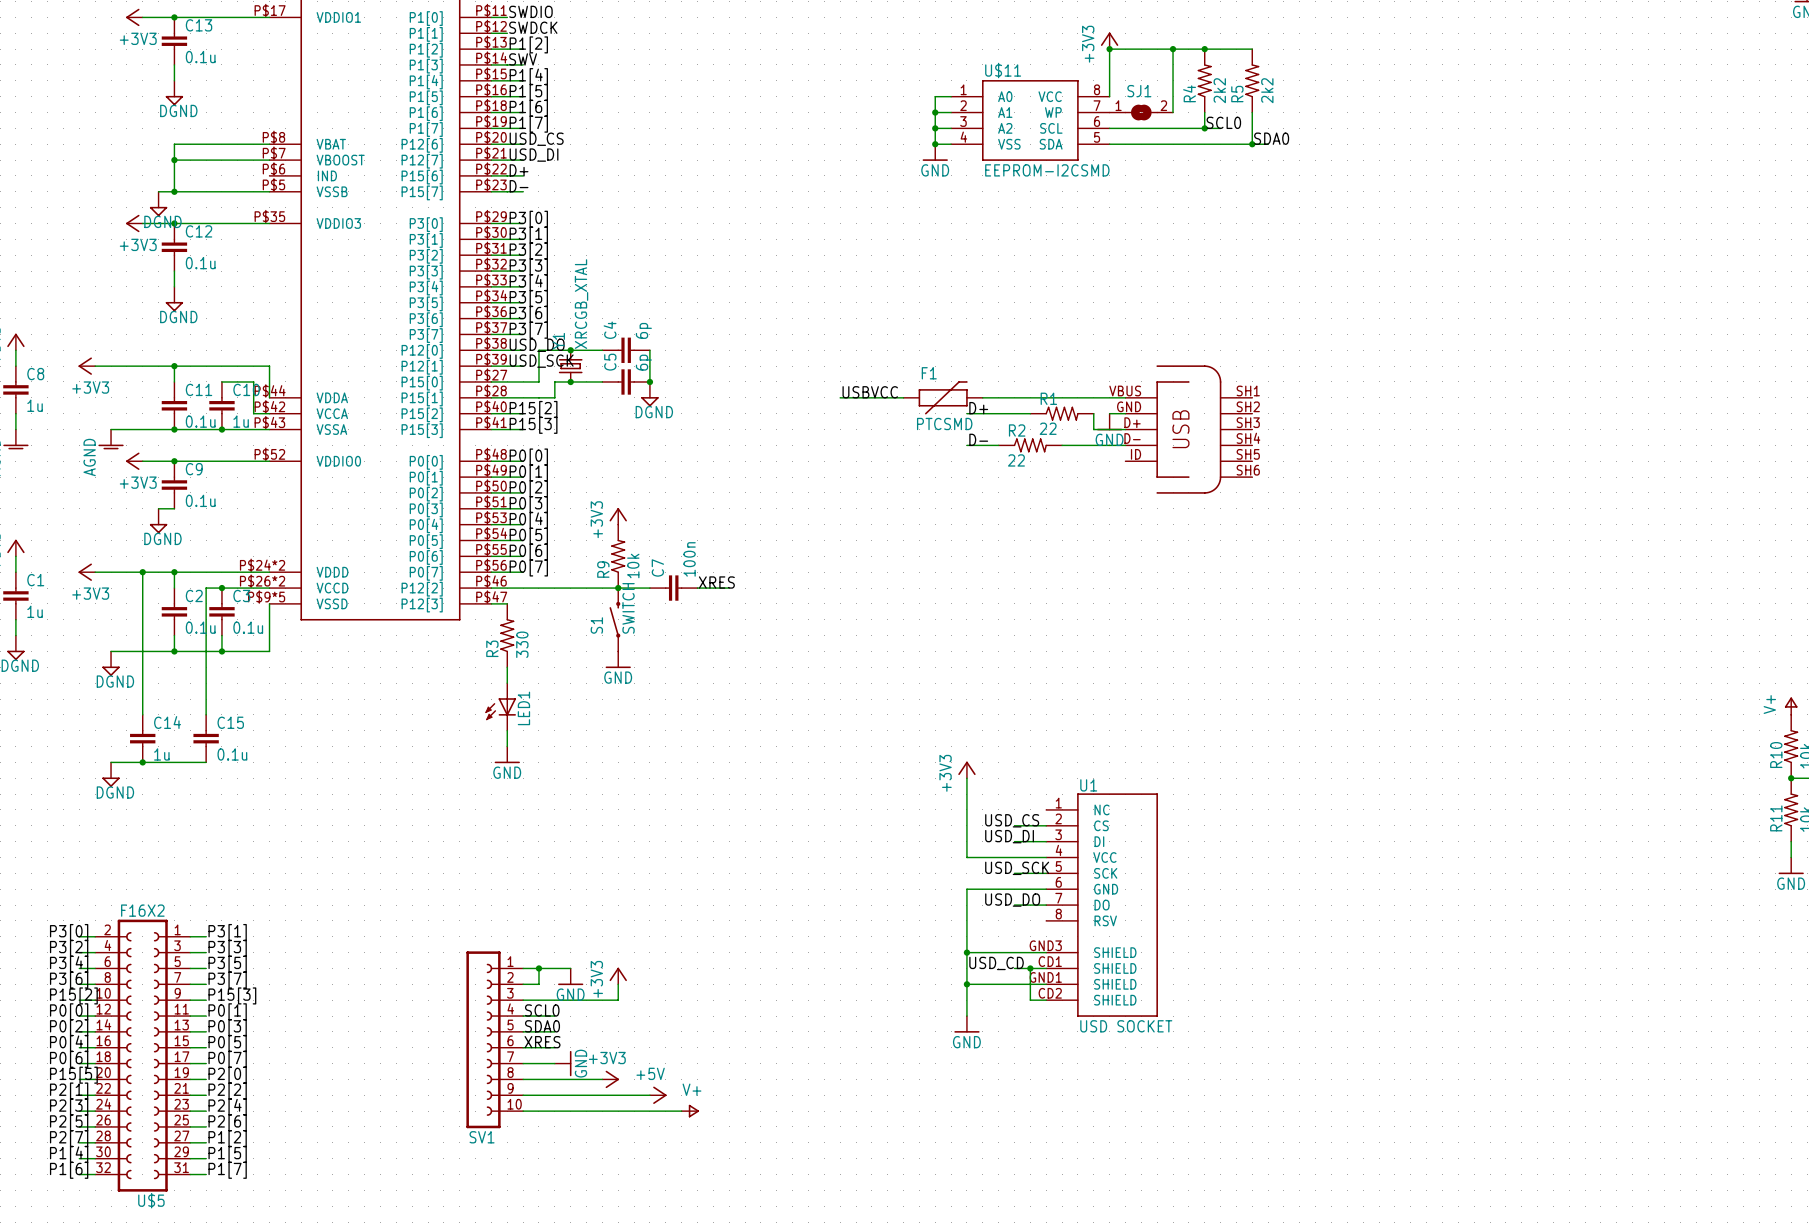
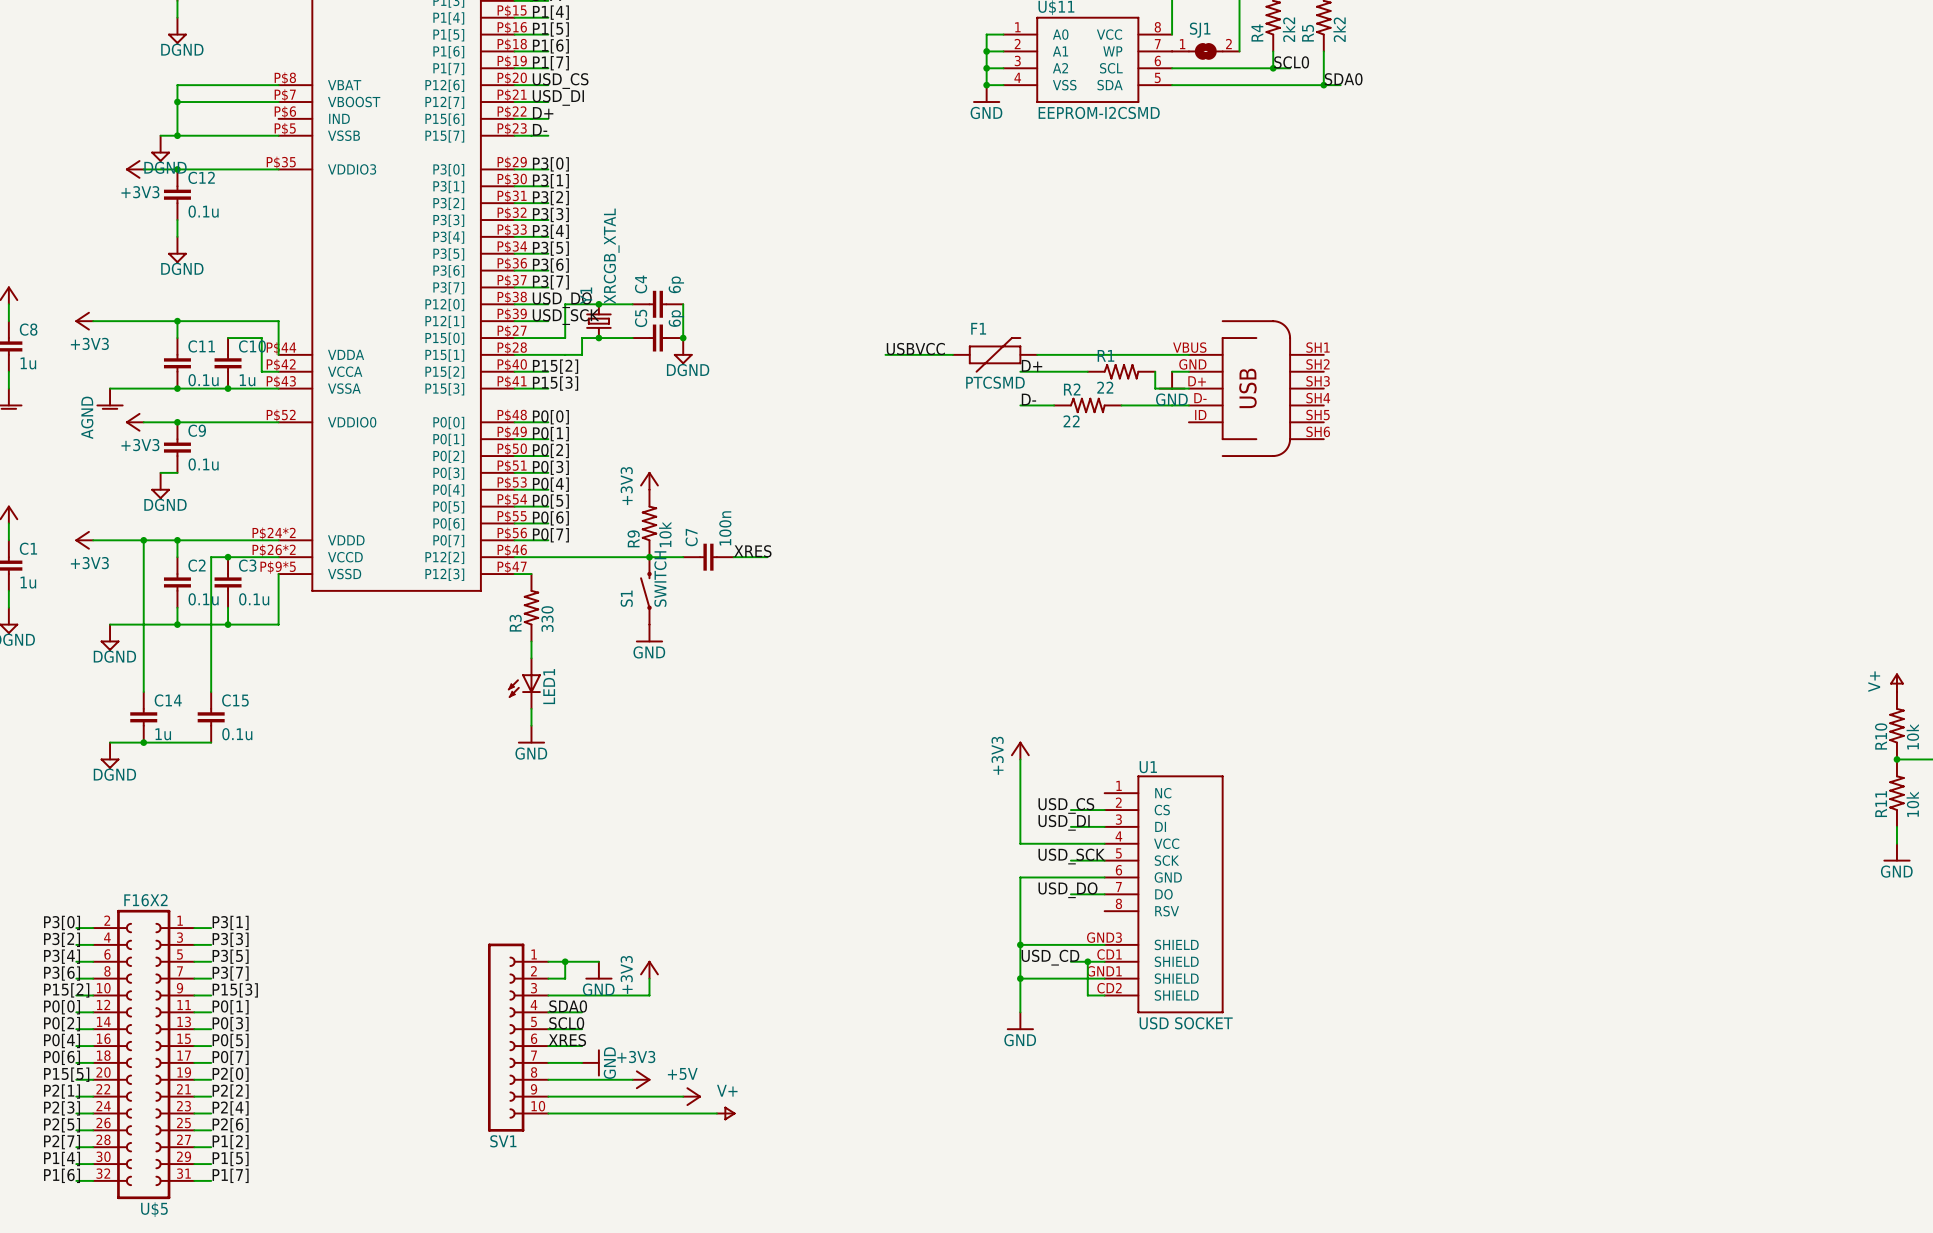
label: SCL0 (542, 1010) -> SDA0 (568, 1006)
label: SDA0 (542, 1026) -> SCL0 (566, 1023)

